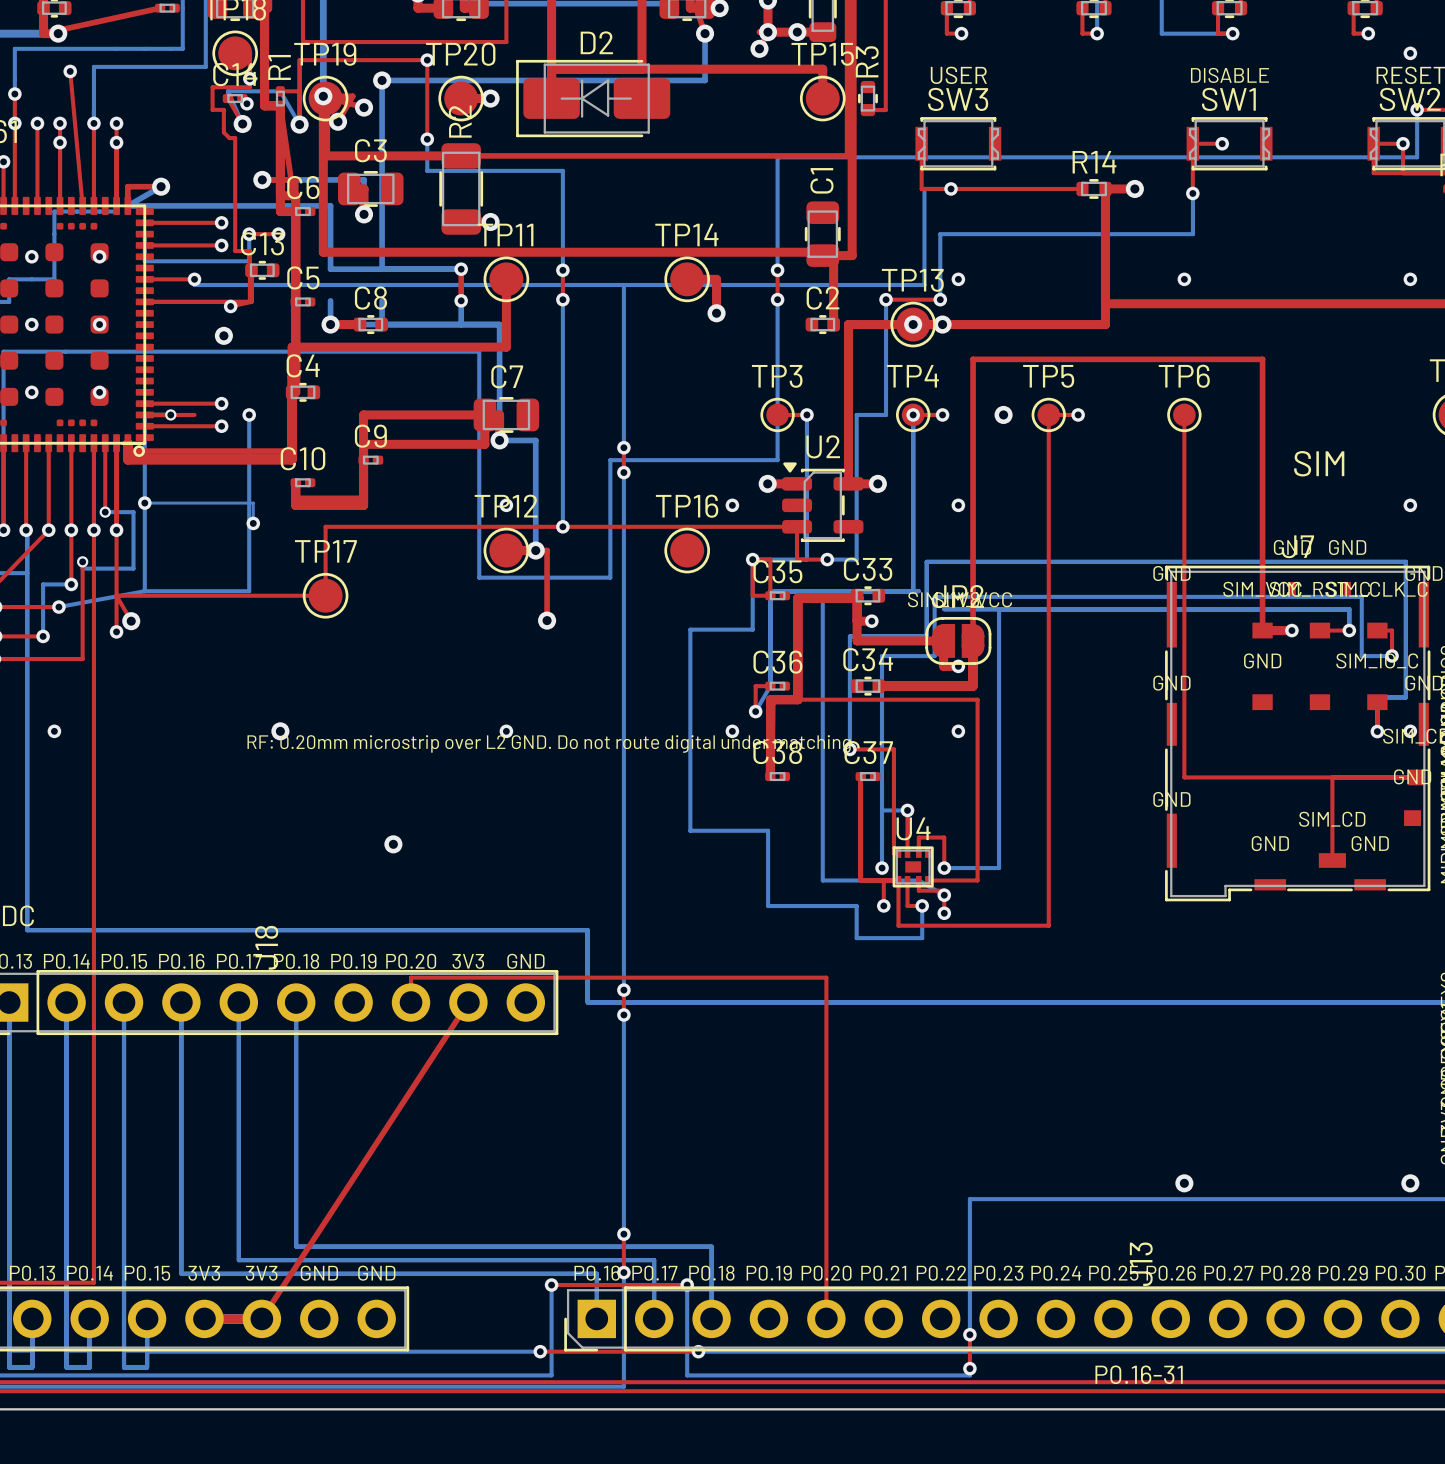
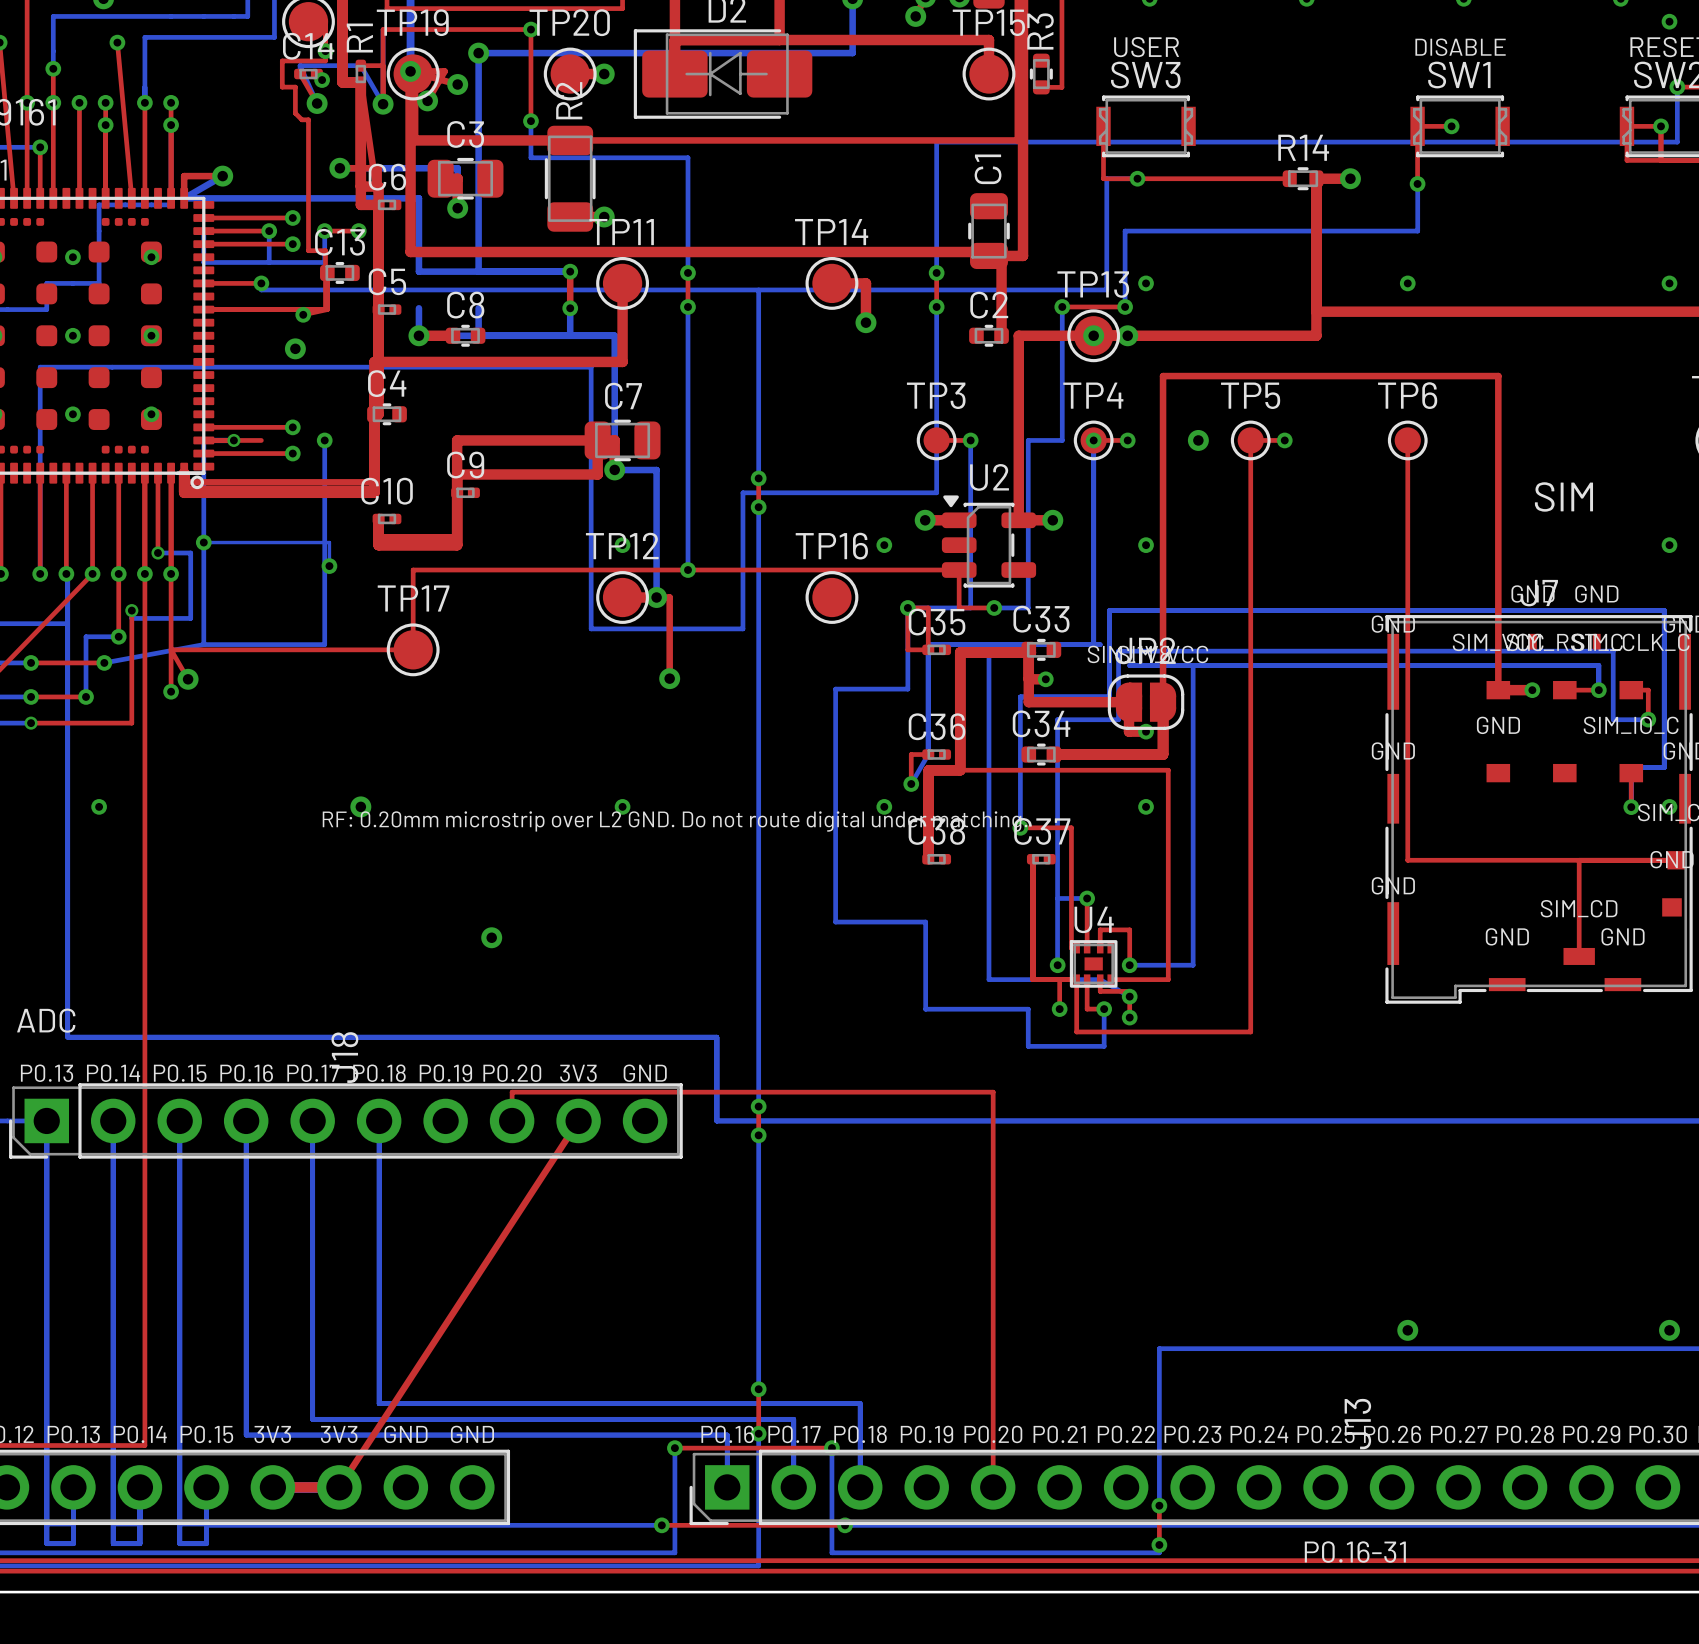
top track: none -> (203, 231) (269, 231)
bottom track: none -> (269, 231) (269, 262)
via: none -> (269, 231)

